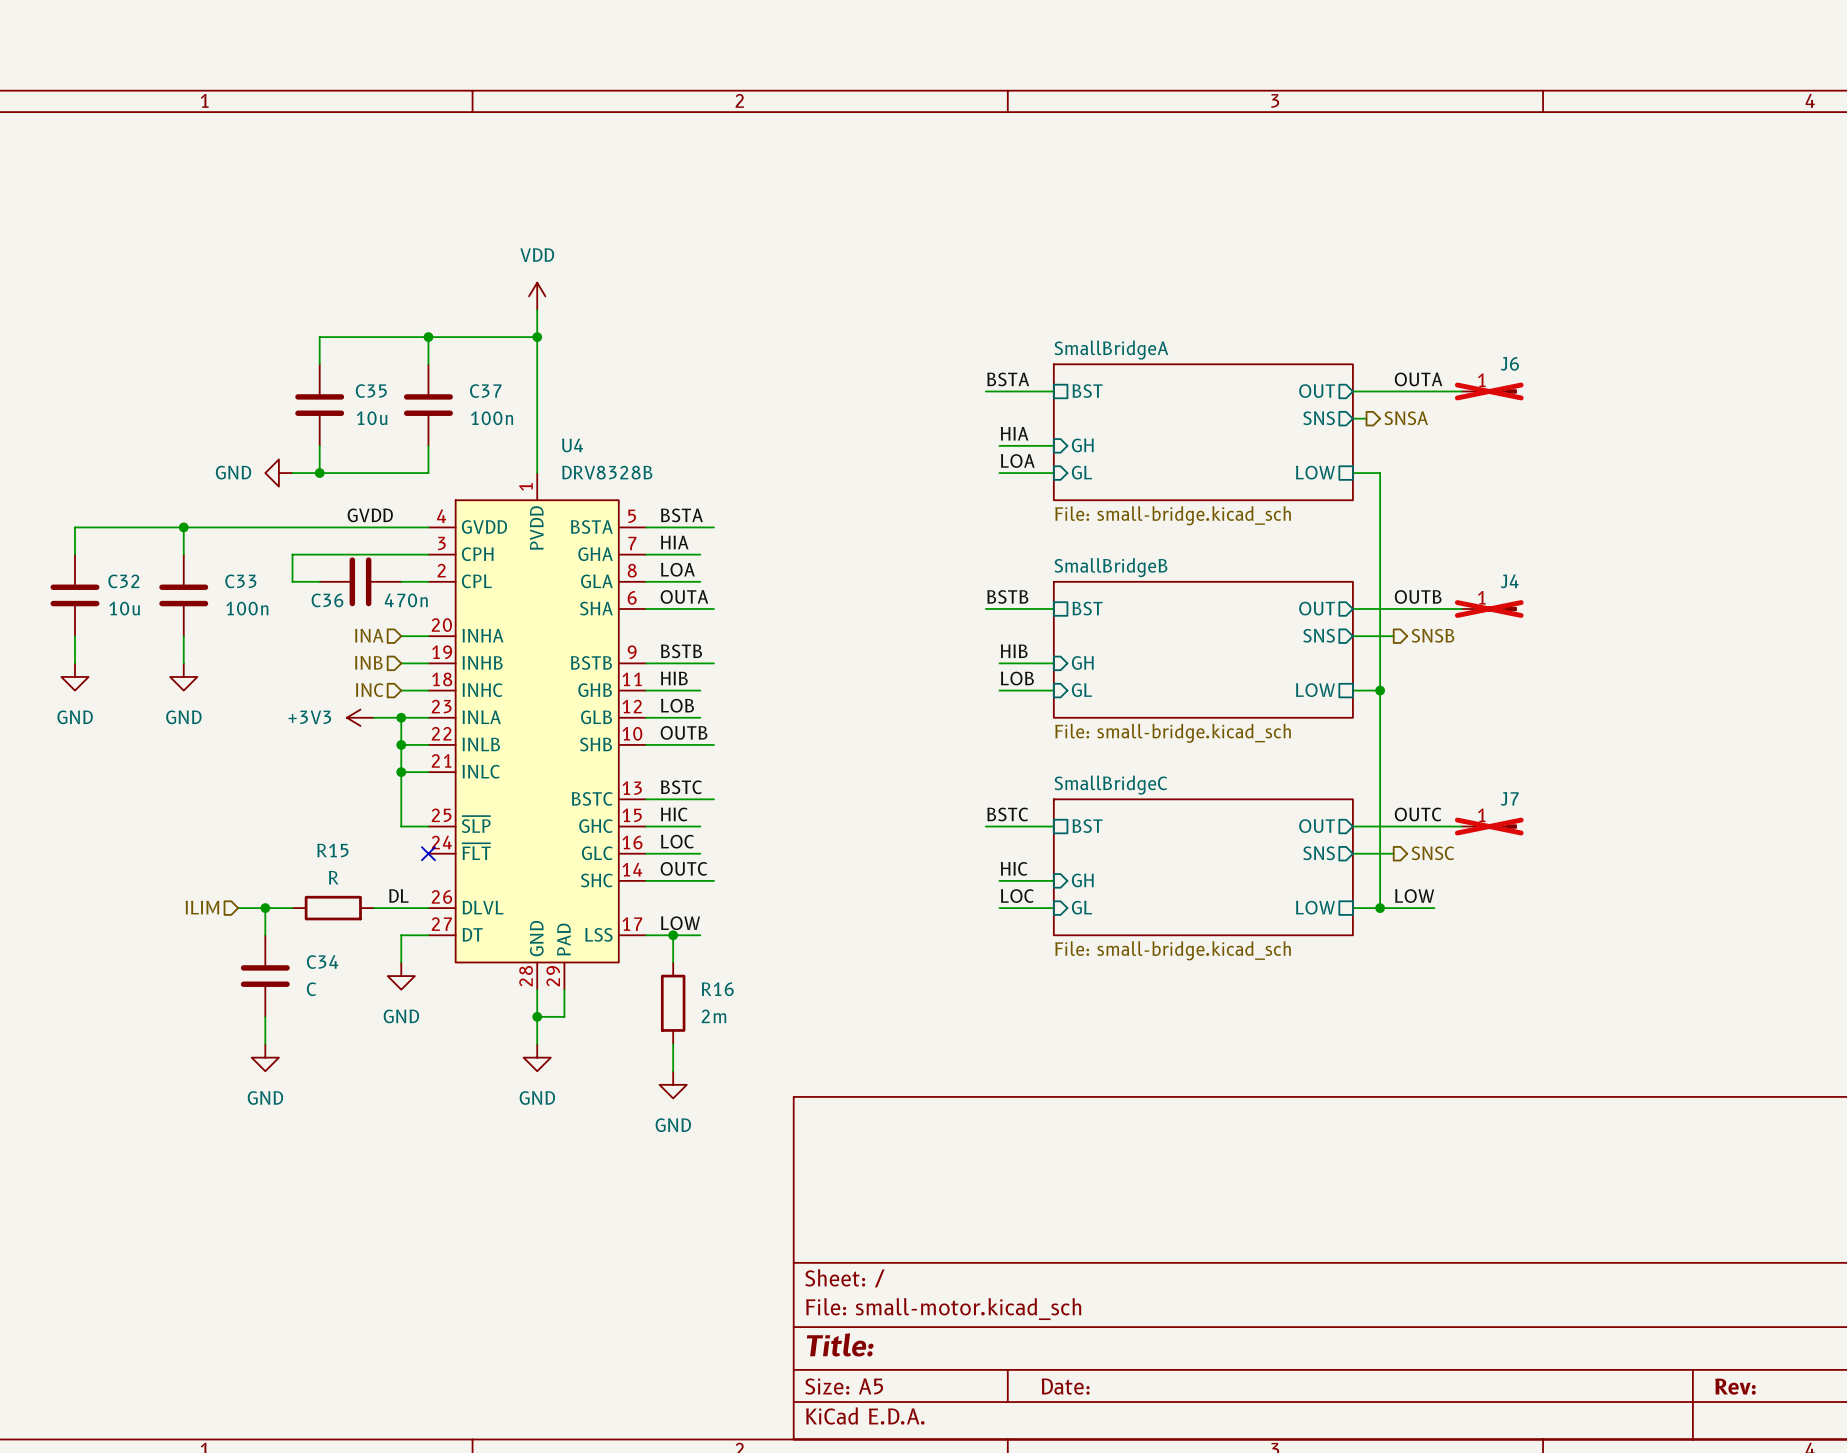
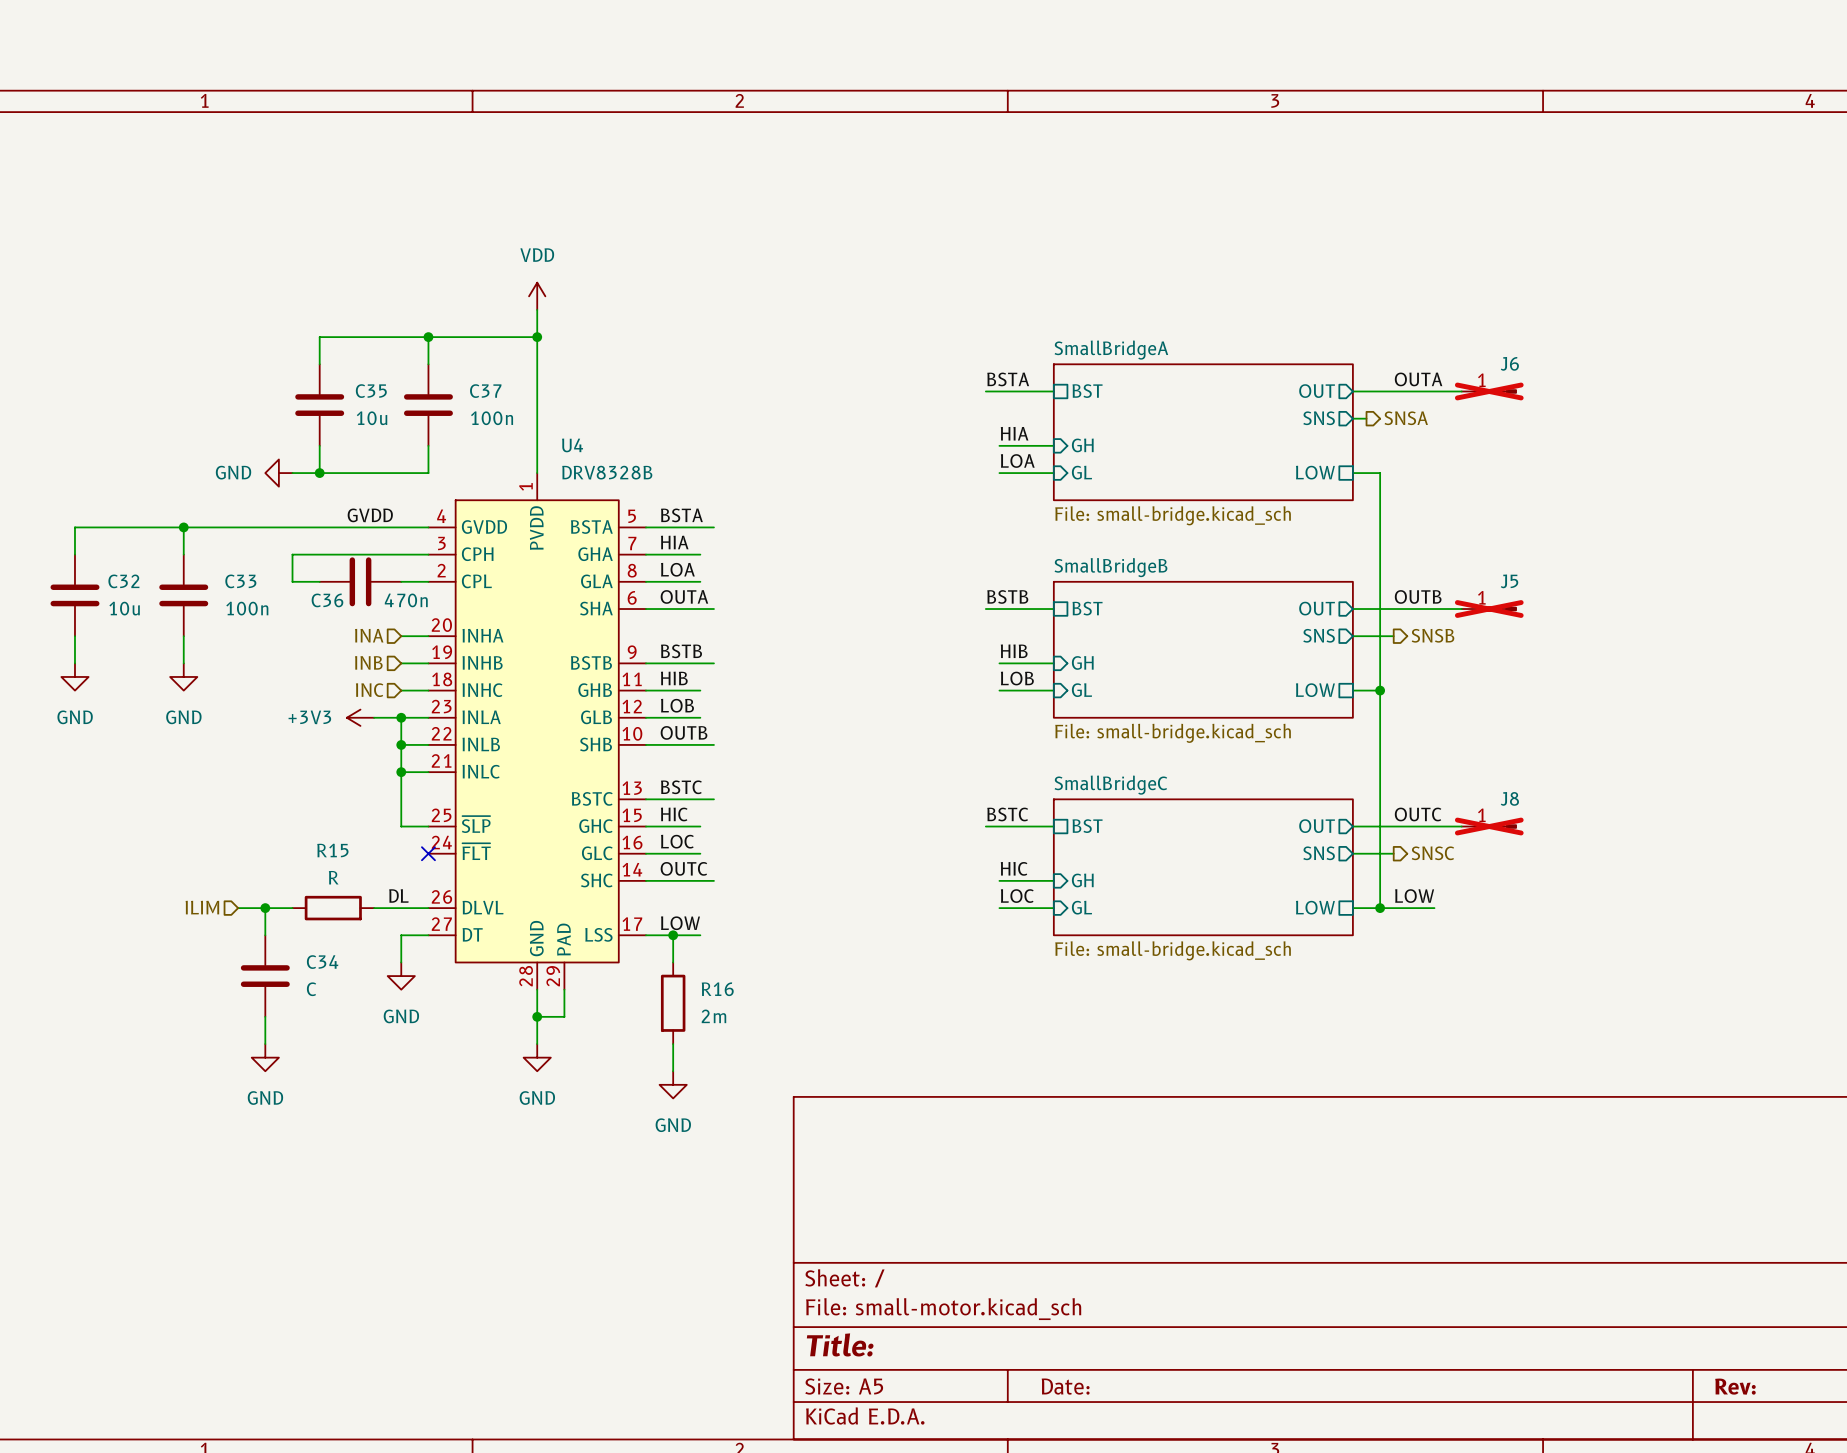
J4 name: J4 (1509, 581) -> J5 (1509, 581)
J7 name: J7 (1509, 798) -> J8 (1509, 798)

